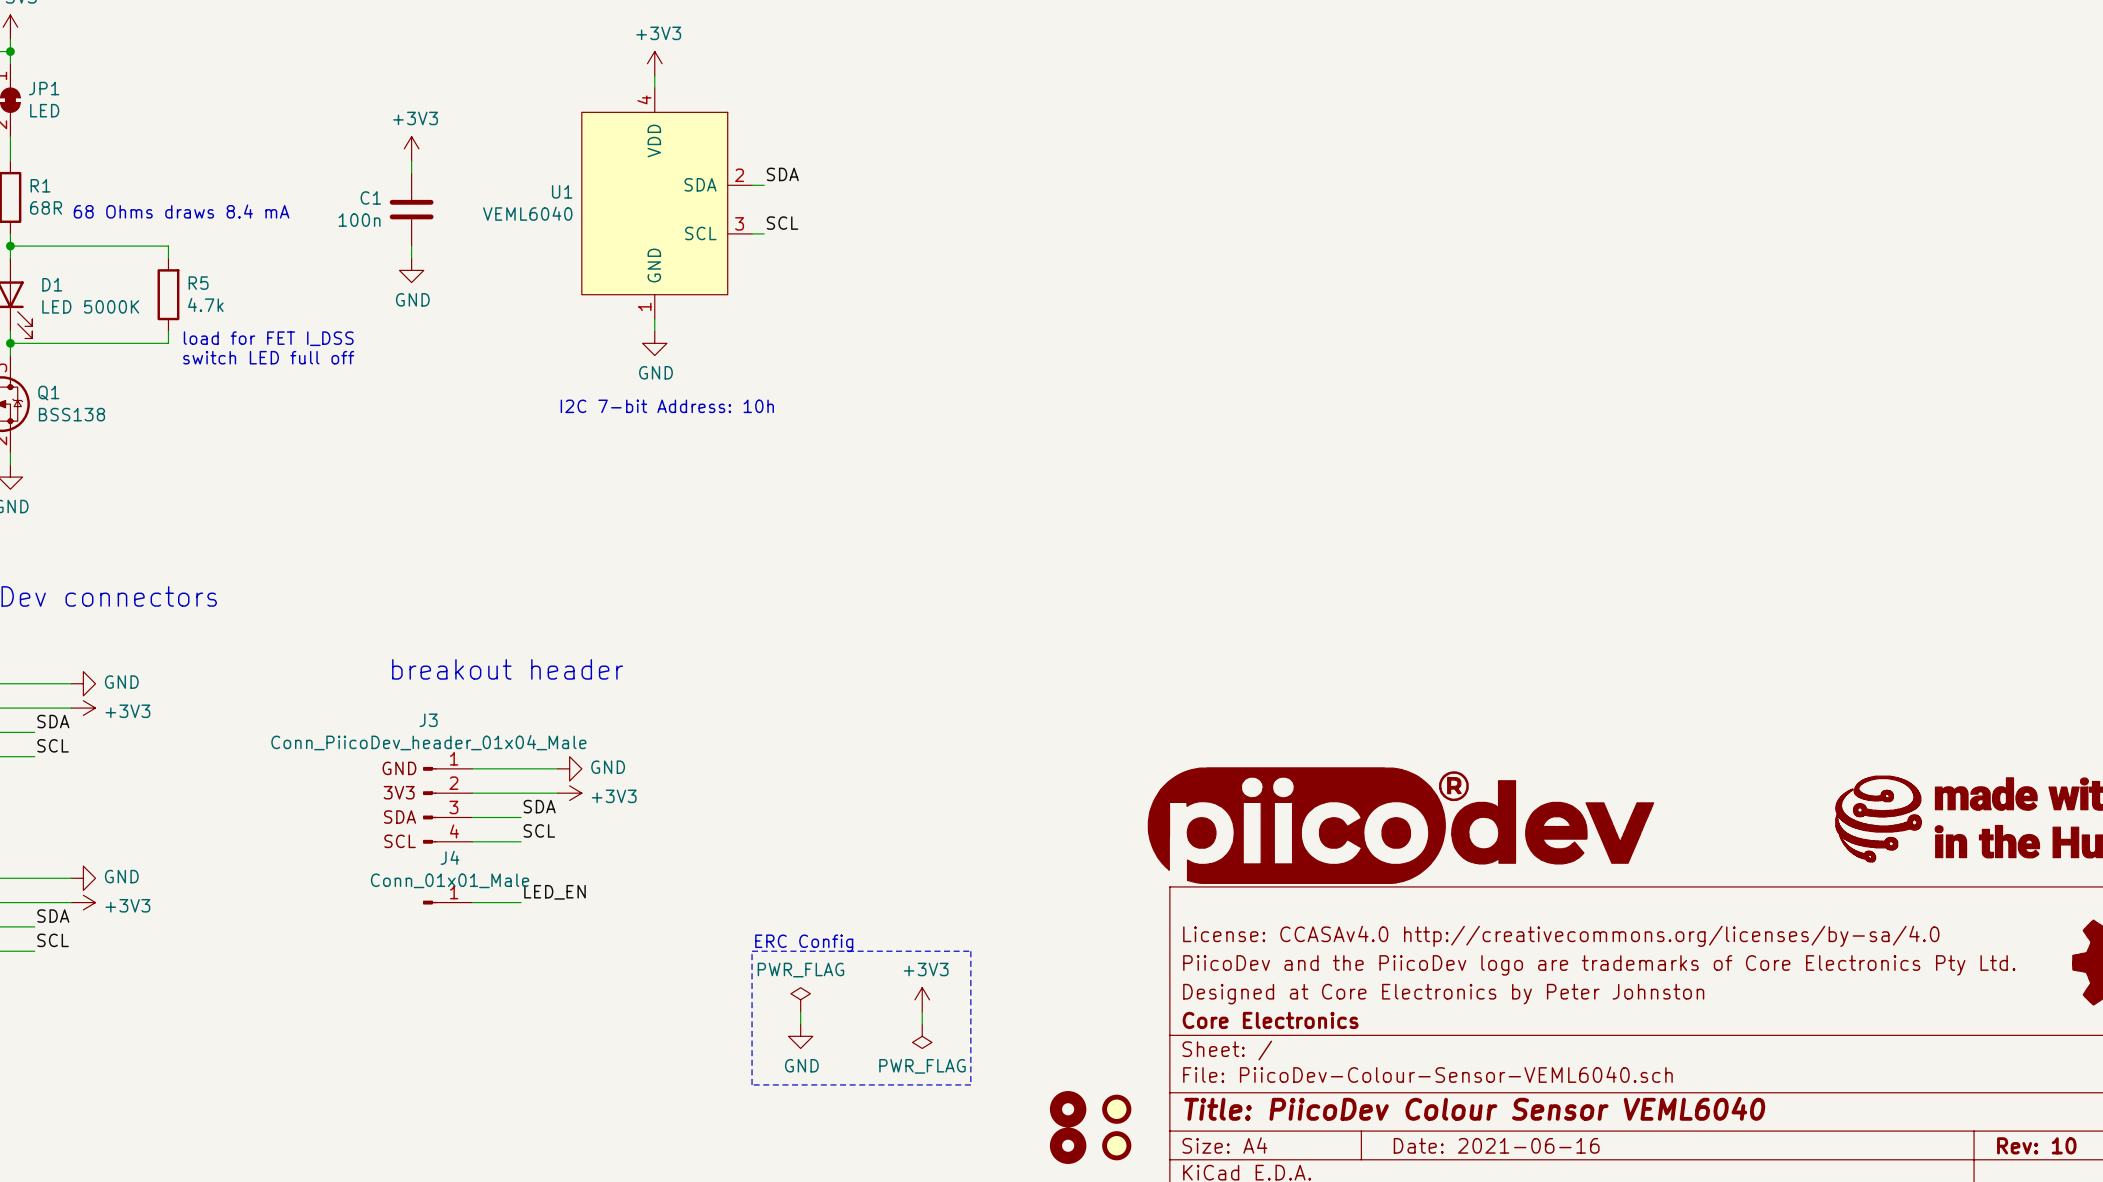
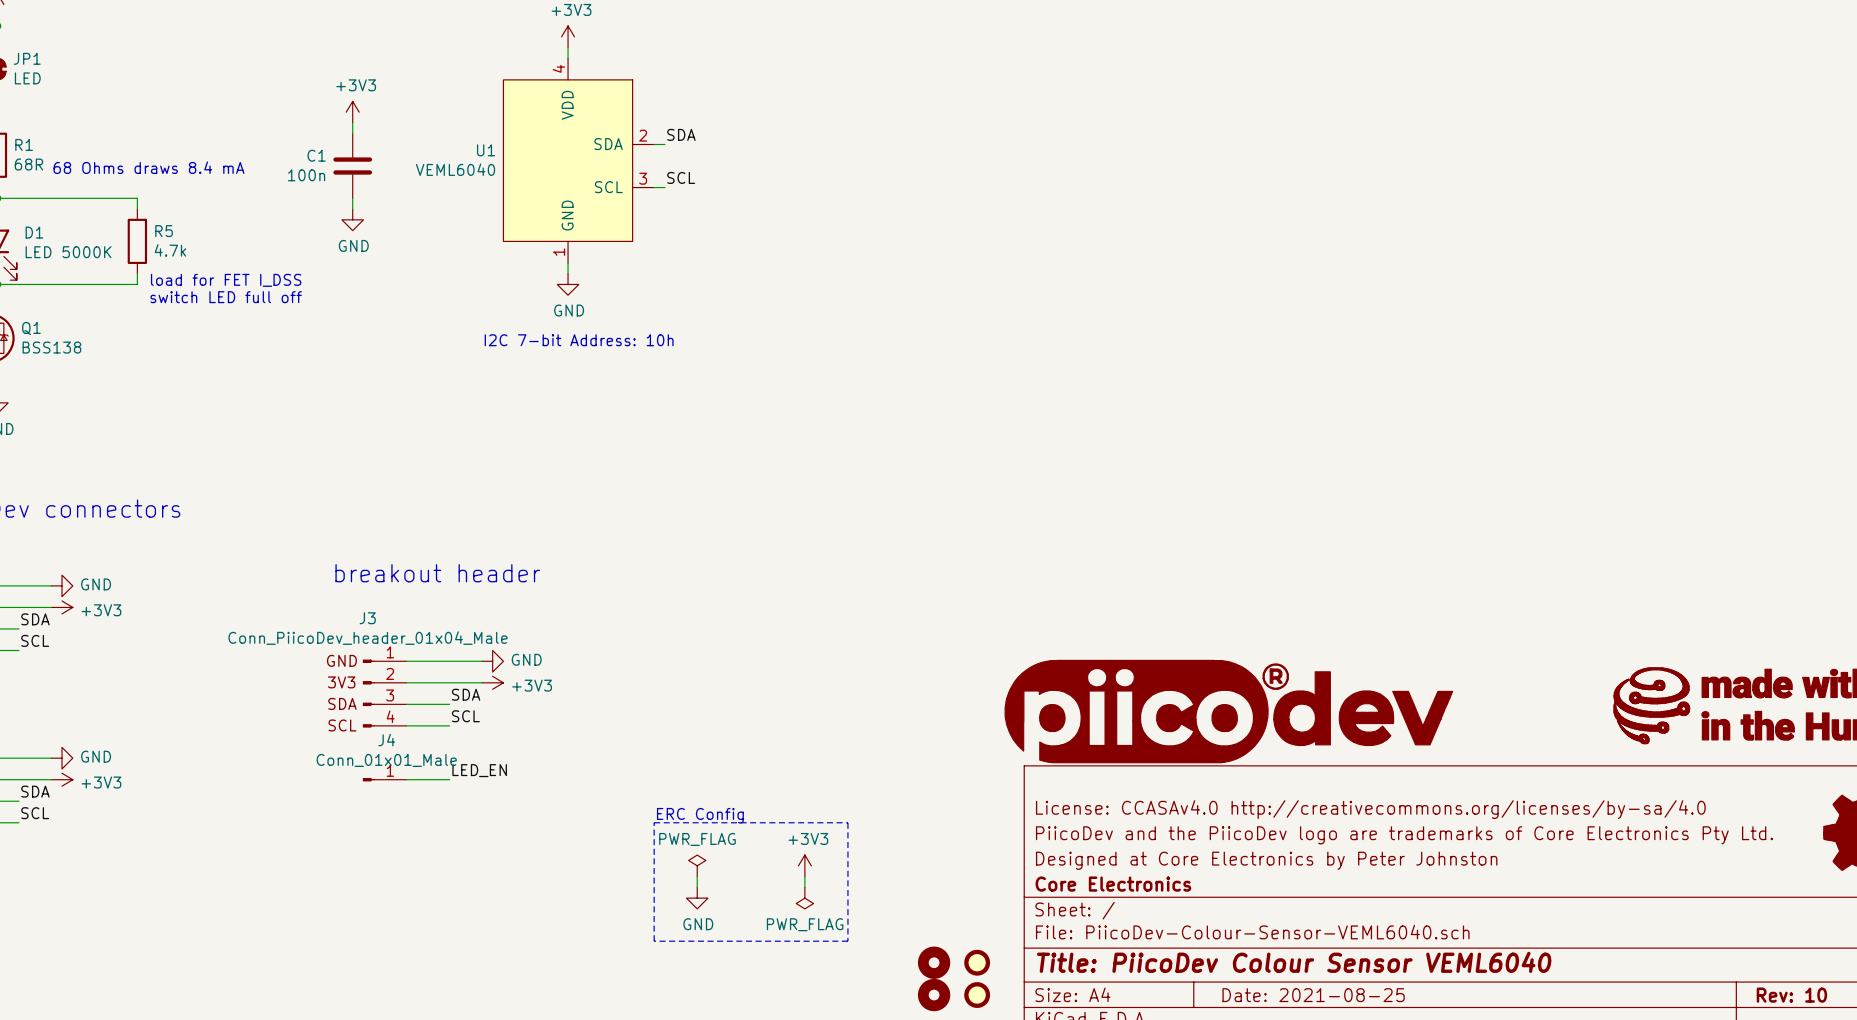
title block: Date: 2021-06-16 (1496, 1145) -> Date: 2021-08-25 (1313, 995)

